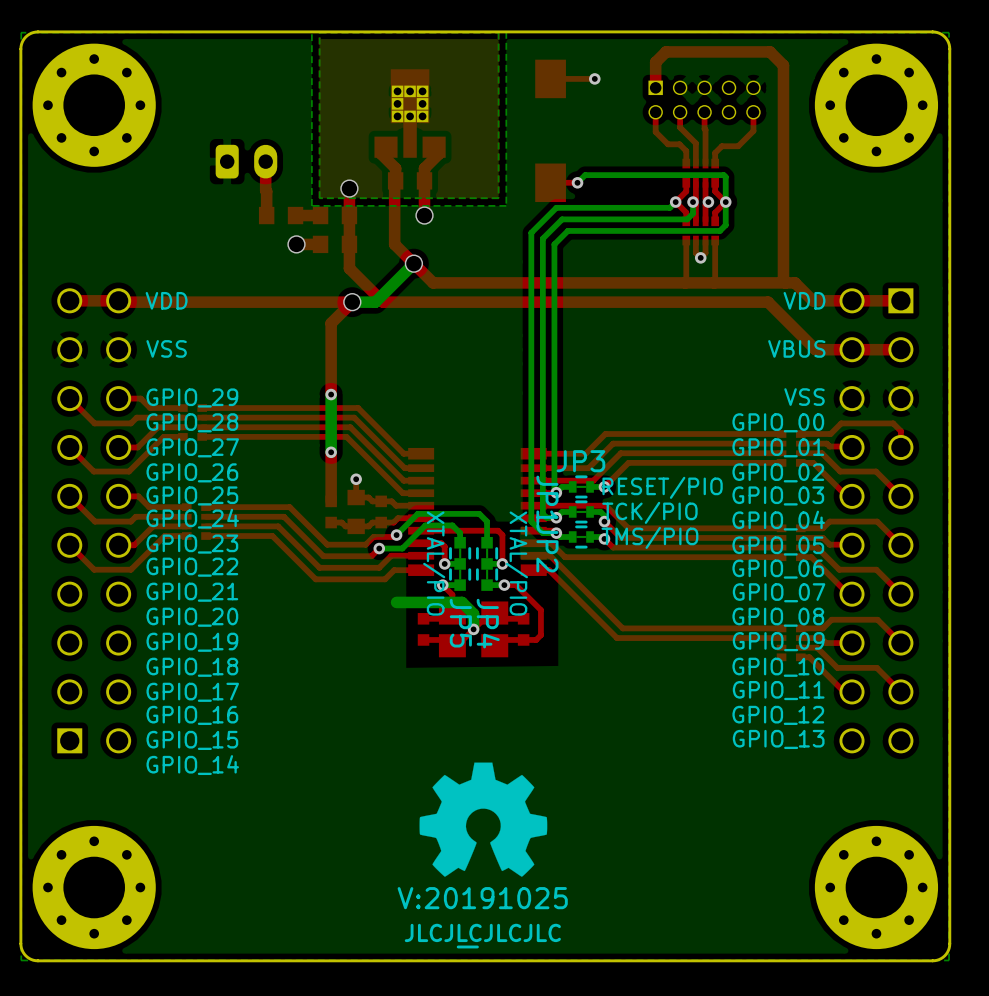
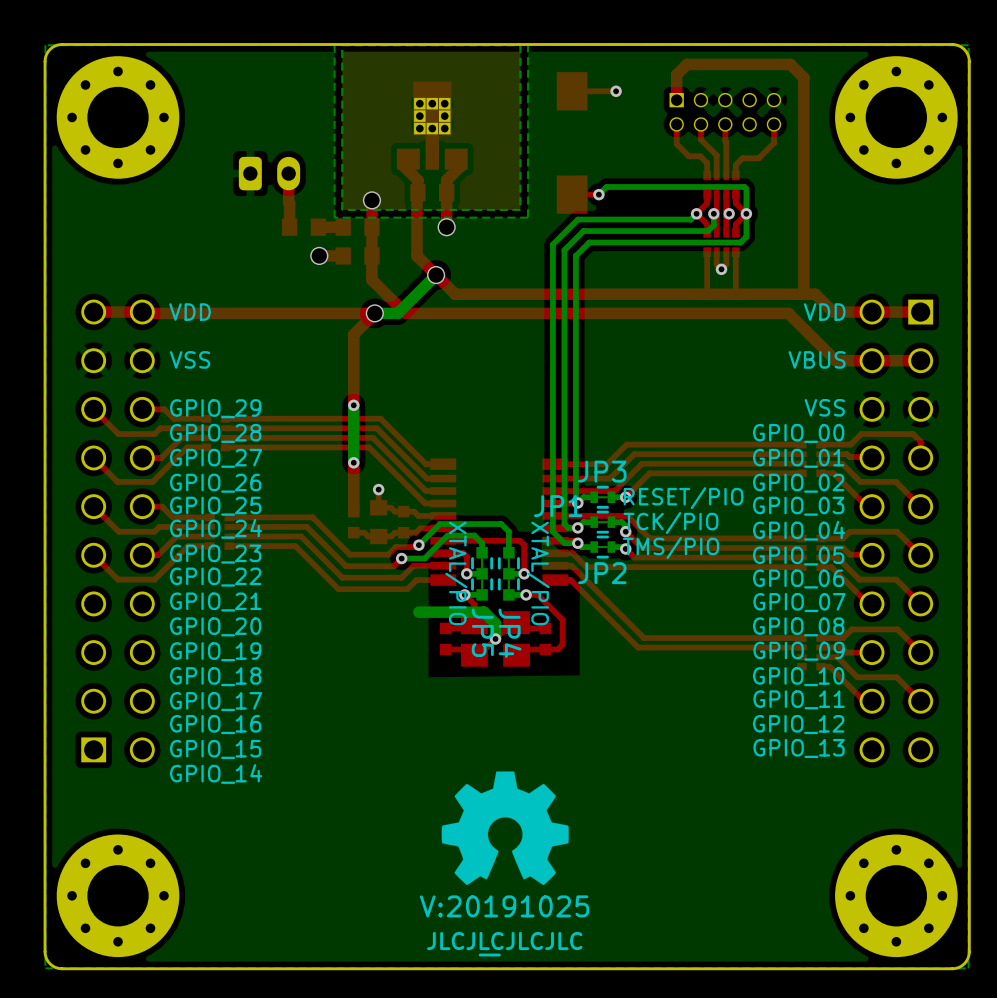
JP1 name rotation: 0° (547, 499) -> 90° counterclockwise (558, 506)
JP2 name rotation: 0° (547, 548) -> 90° counterclockwise (602, 573)

